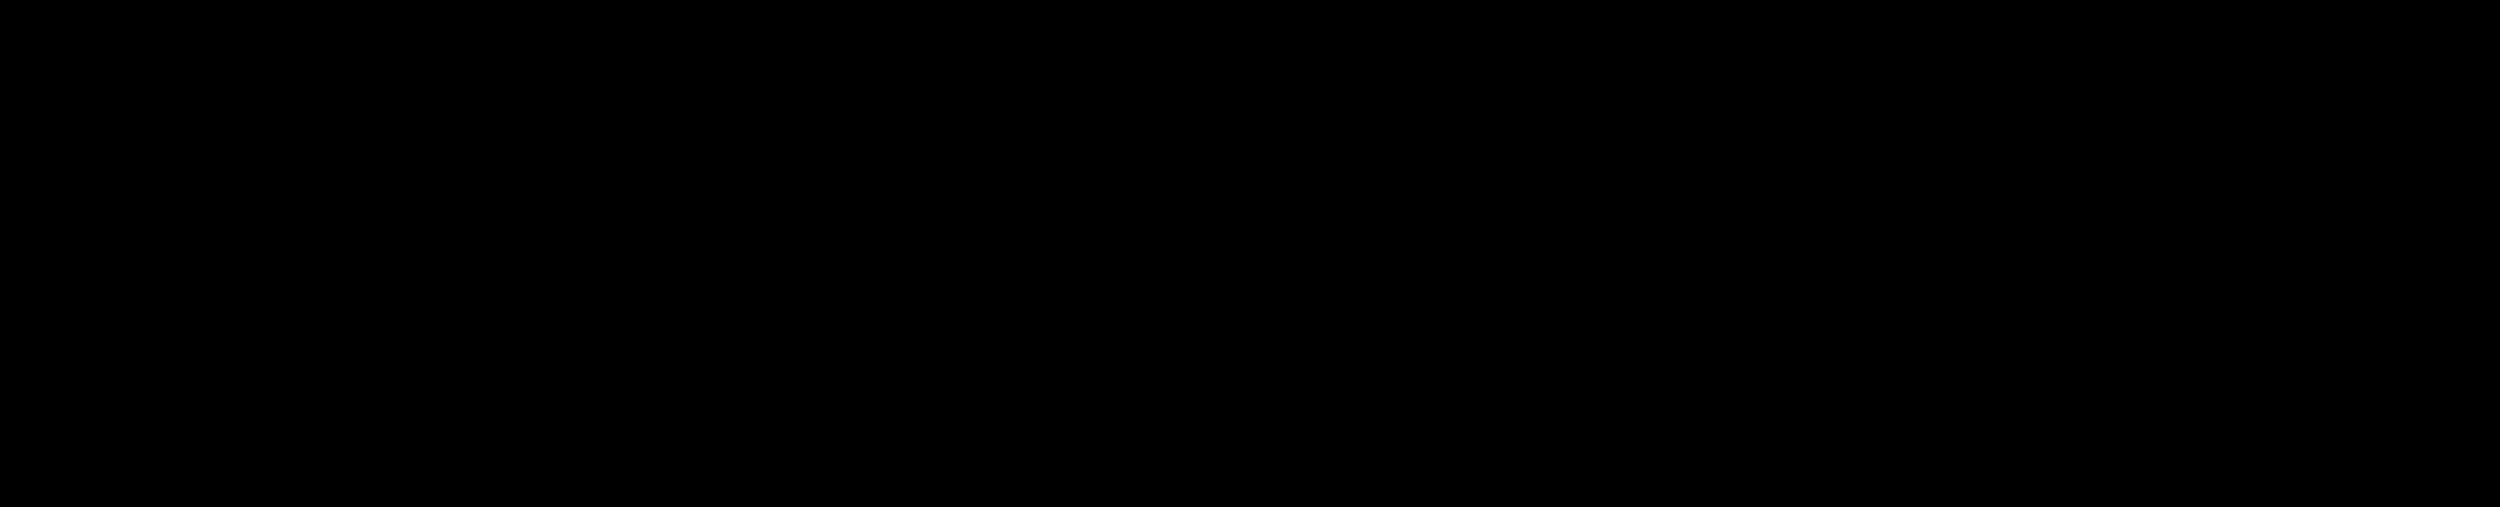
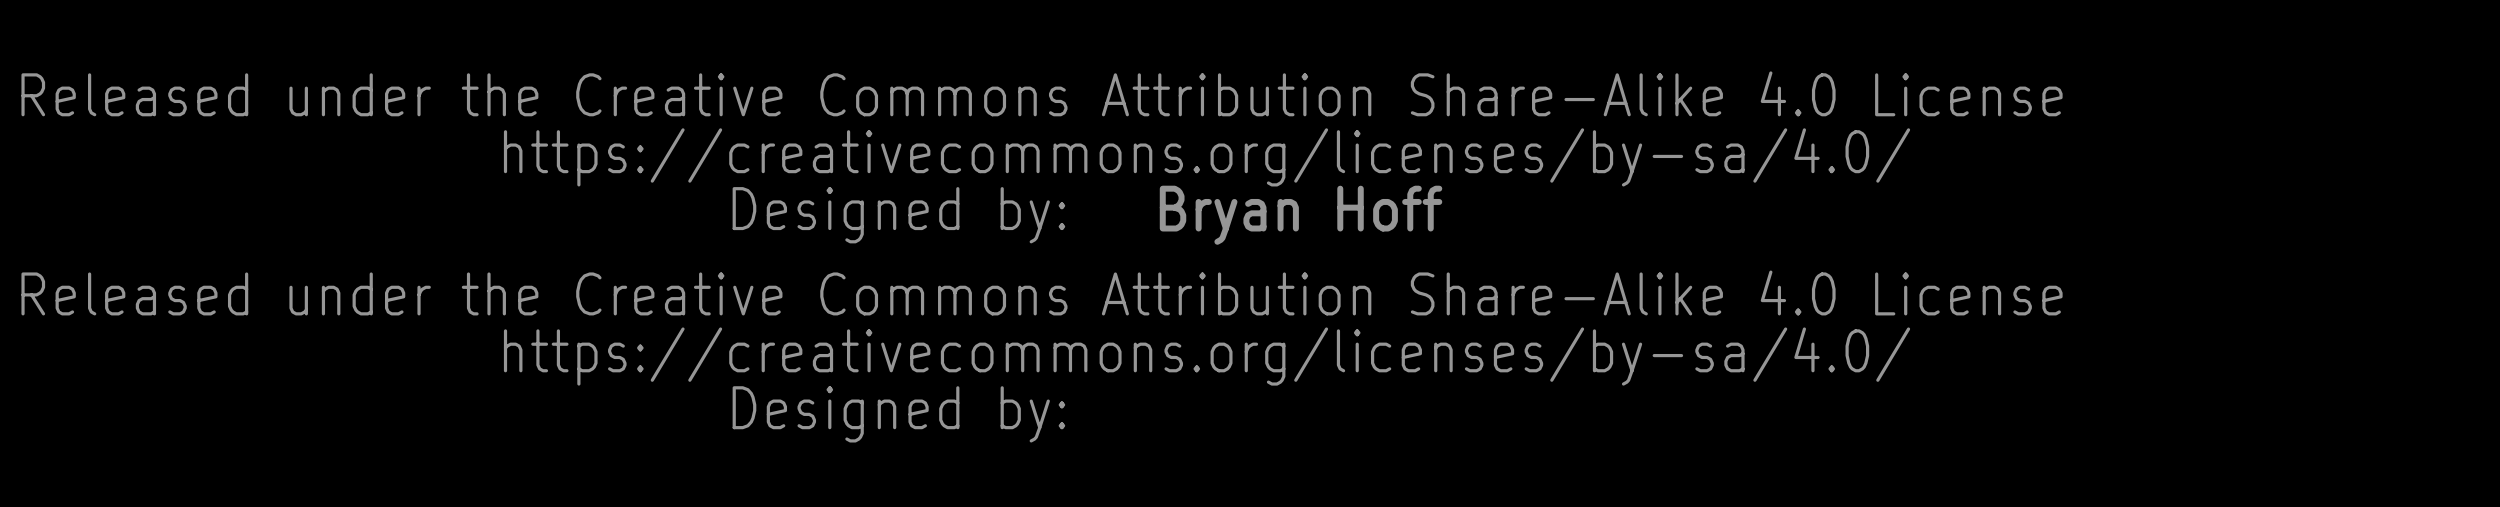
drawing: none -> [21, 71, 2063, 443]
text: none -> Bryan Hoff (1301, 215)

